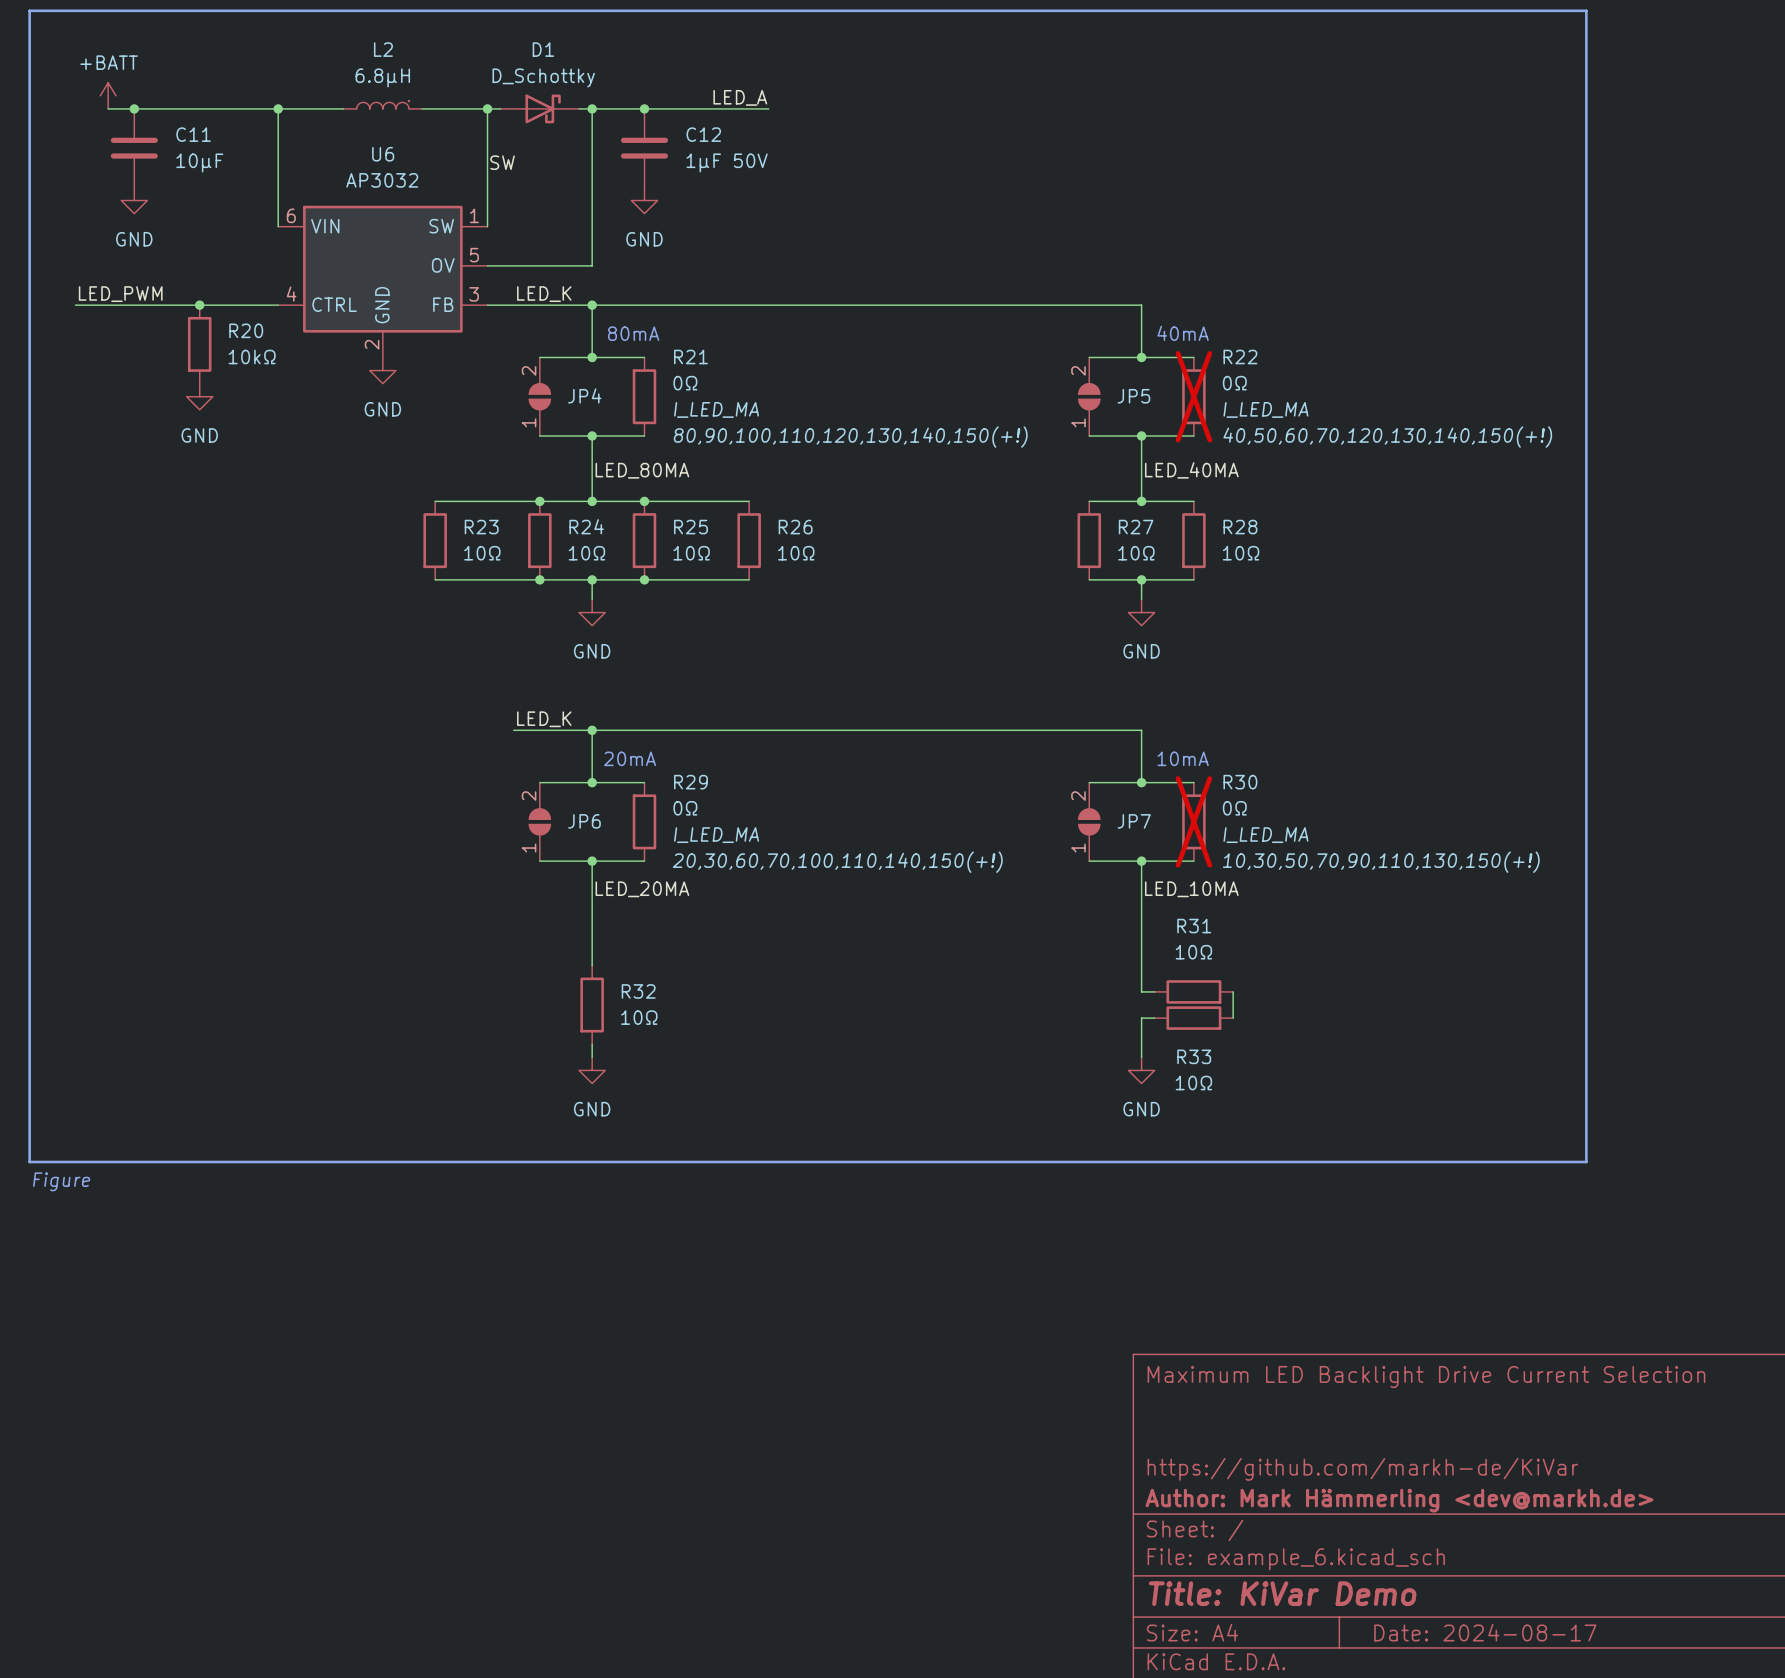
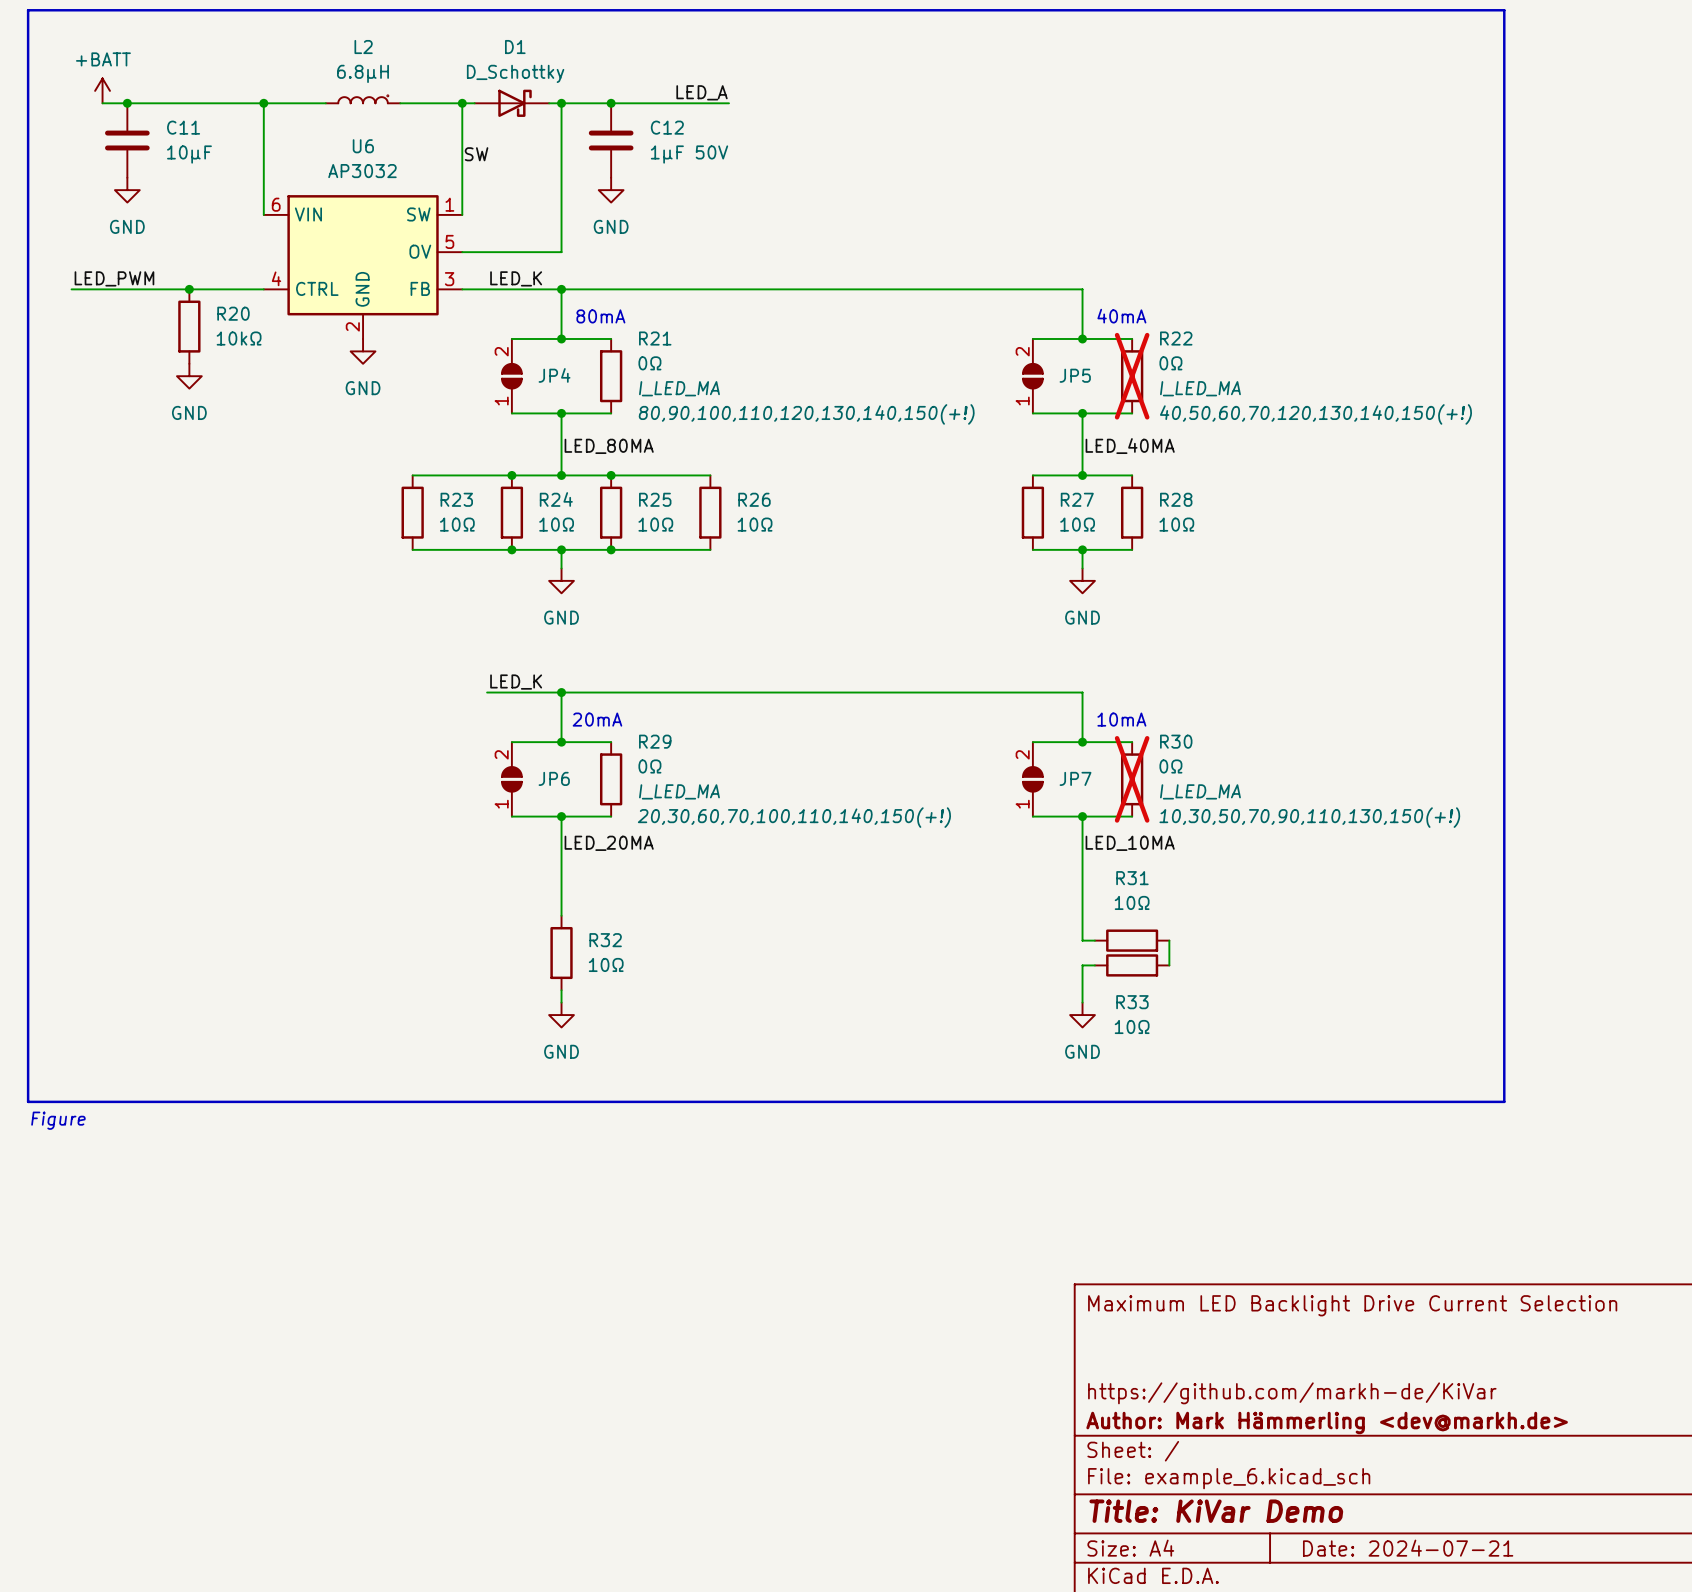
title block: Date: 2024-08-17 (1485, 1632) -> Date: 2024-07-21 (1408, 1548)

